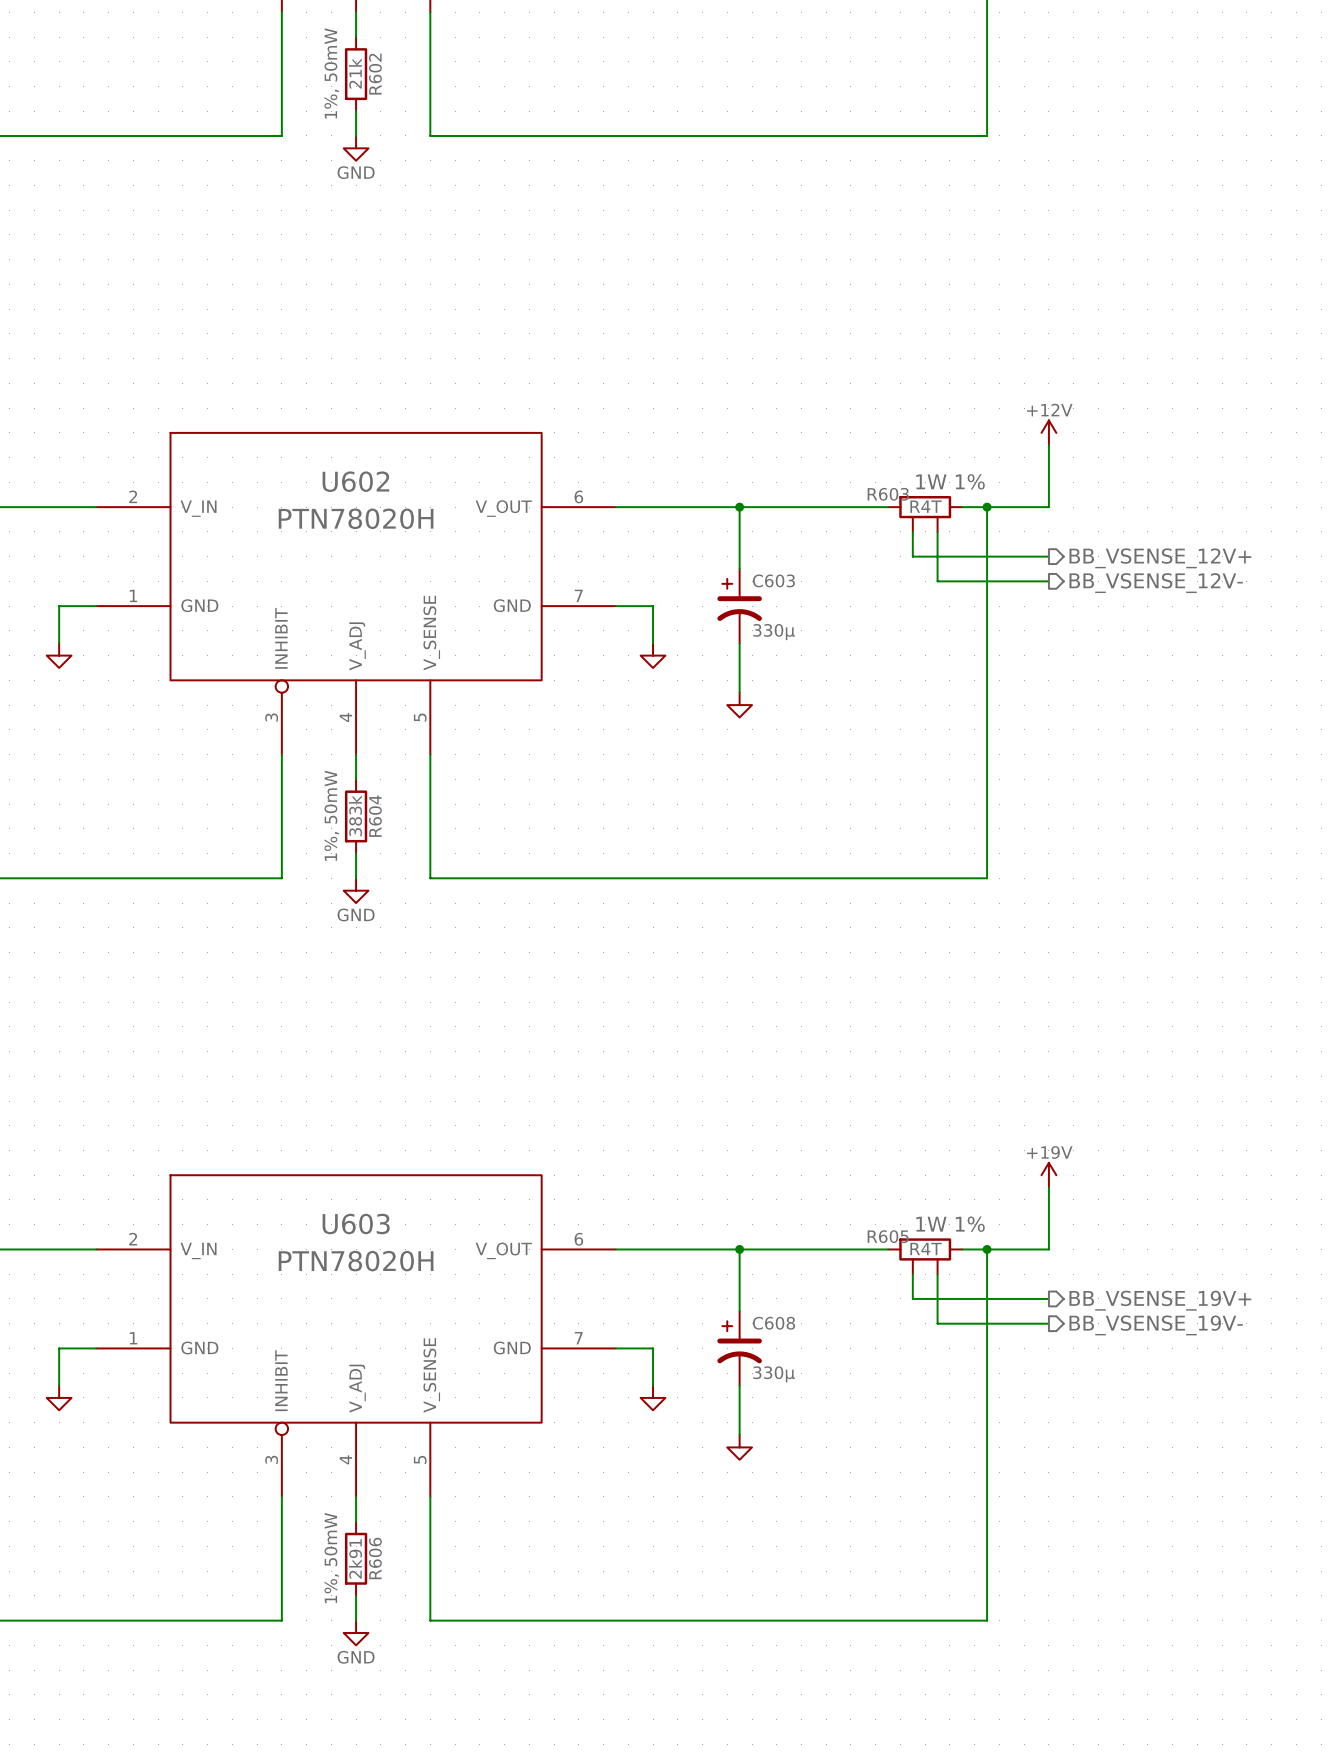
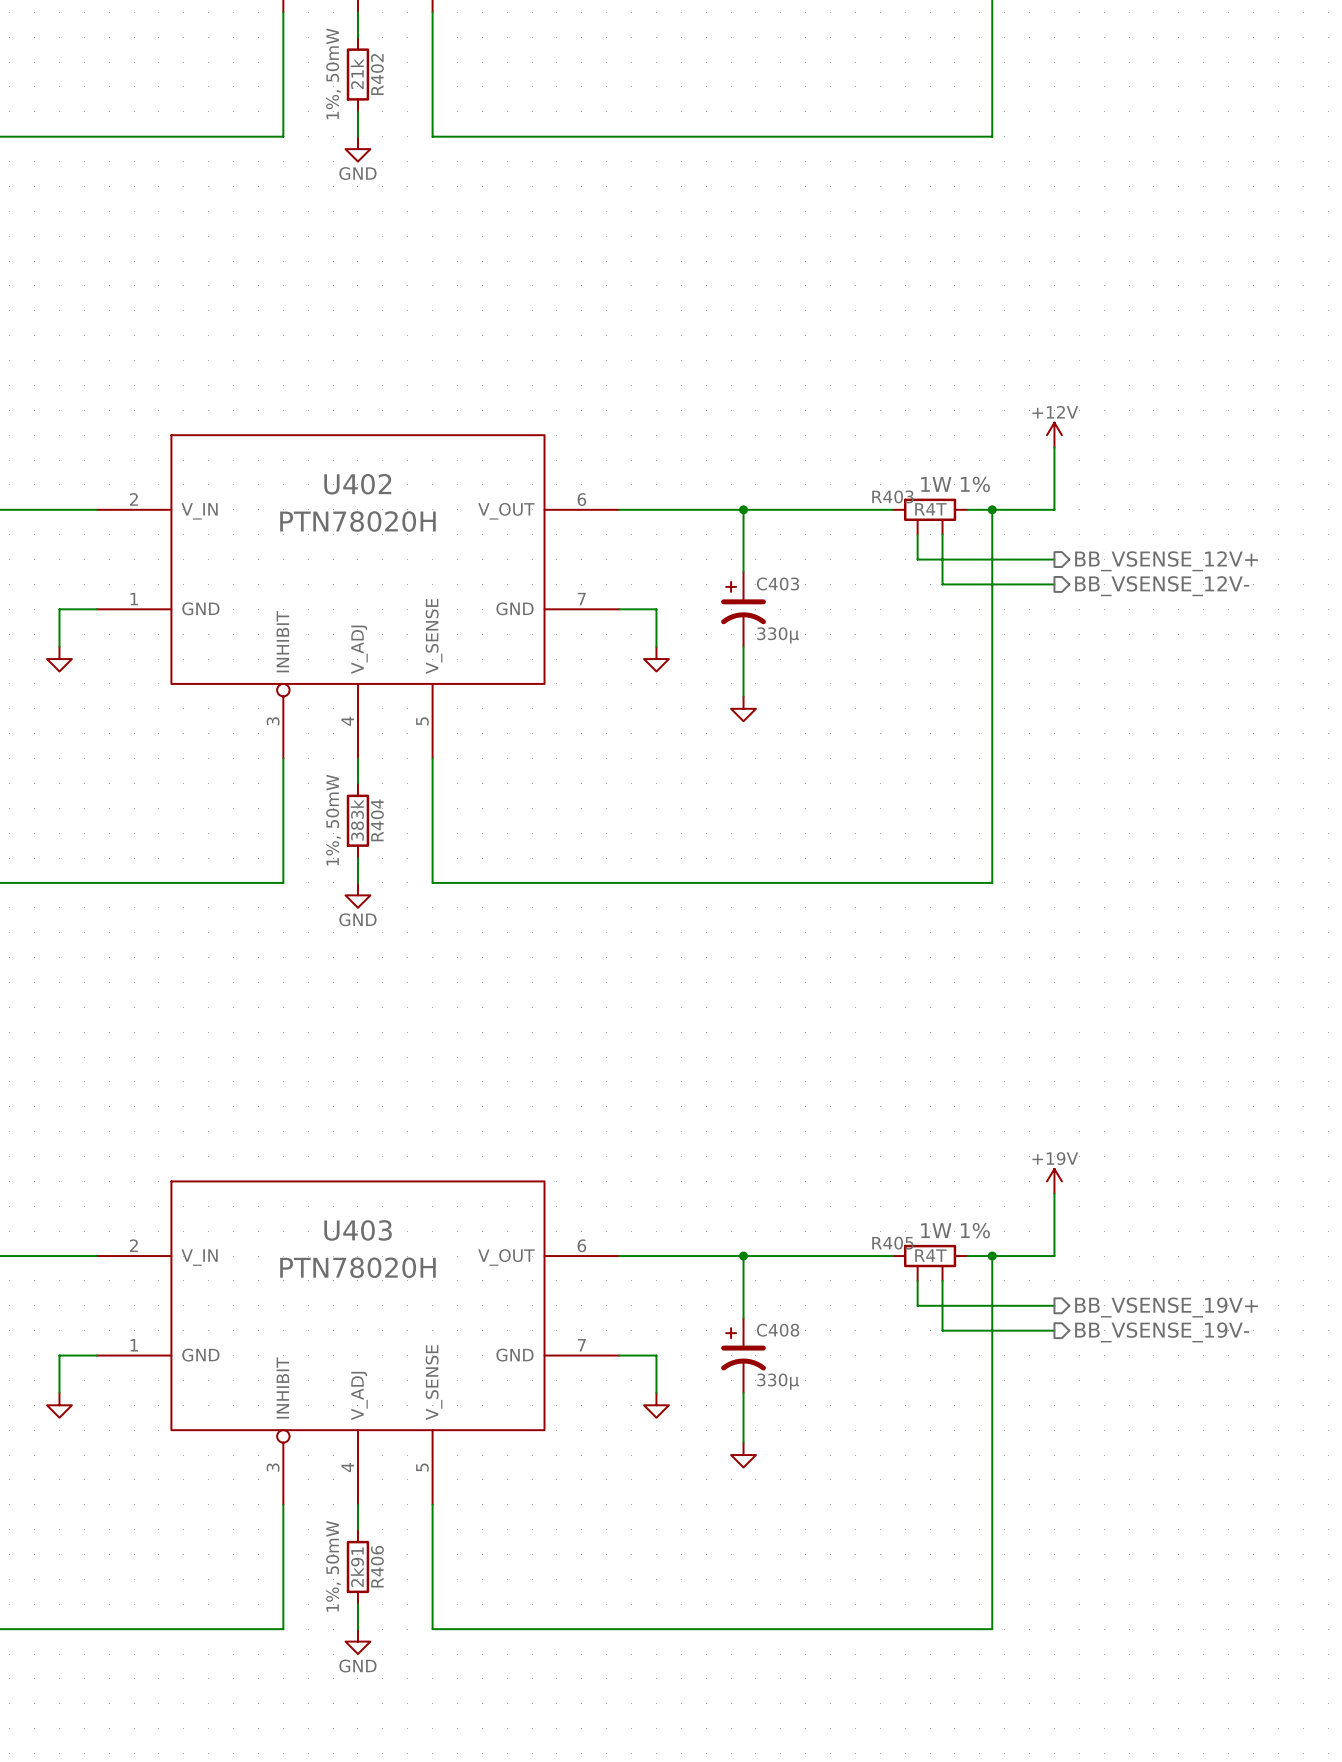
R602 name: R602 (375, 74) -> R402 (377, 74)
U602 name: U602 (355, 481) -> U402 (357, 484)
R603 name: R603 (888, 494) -> R403 (892, 496)
C603 name: C603 (773, 580) -> C403 (777, 583)
R604 name: R604 (375, 816) -> R404 (377, 820)
U603 name: U603 (356, 1223) -> U403 (358, 1230)
R605 name: R605 (888, 1236) -> R405 (892, 1243)
C608 name: C608 (774, 1323) -> C408 (778, 1330)
R606 name: R606 (375, 1558) -> R406 (377, 1566)

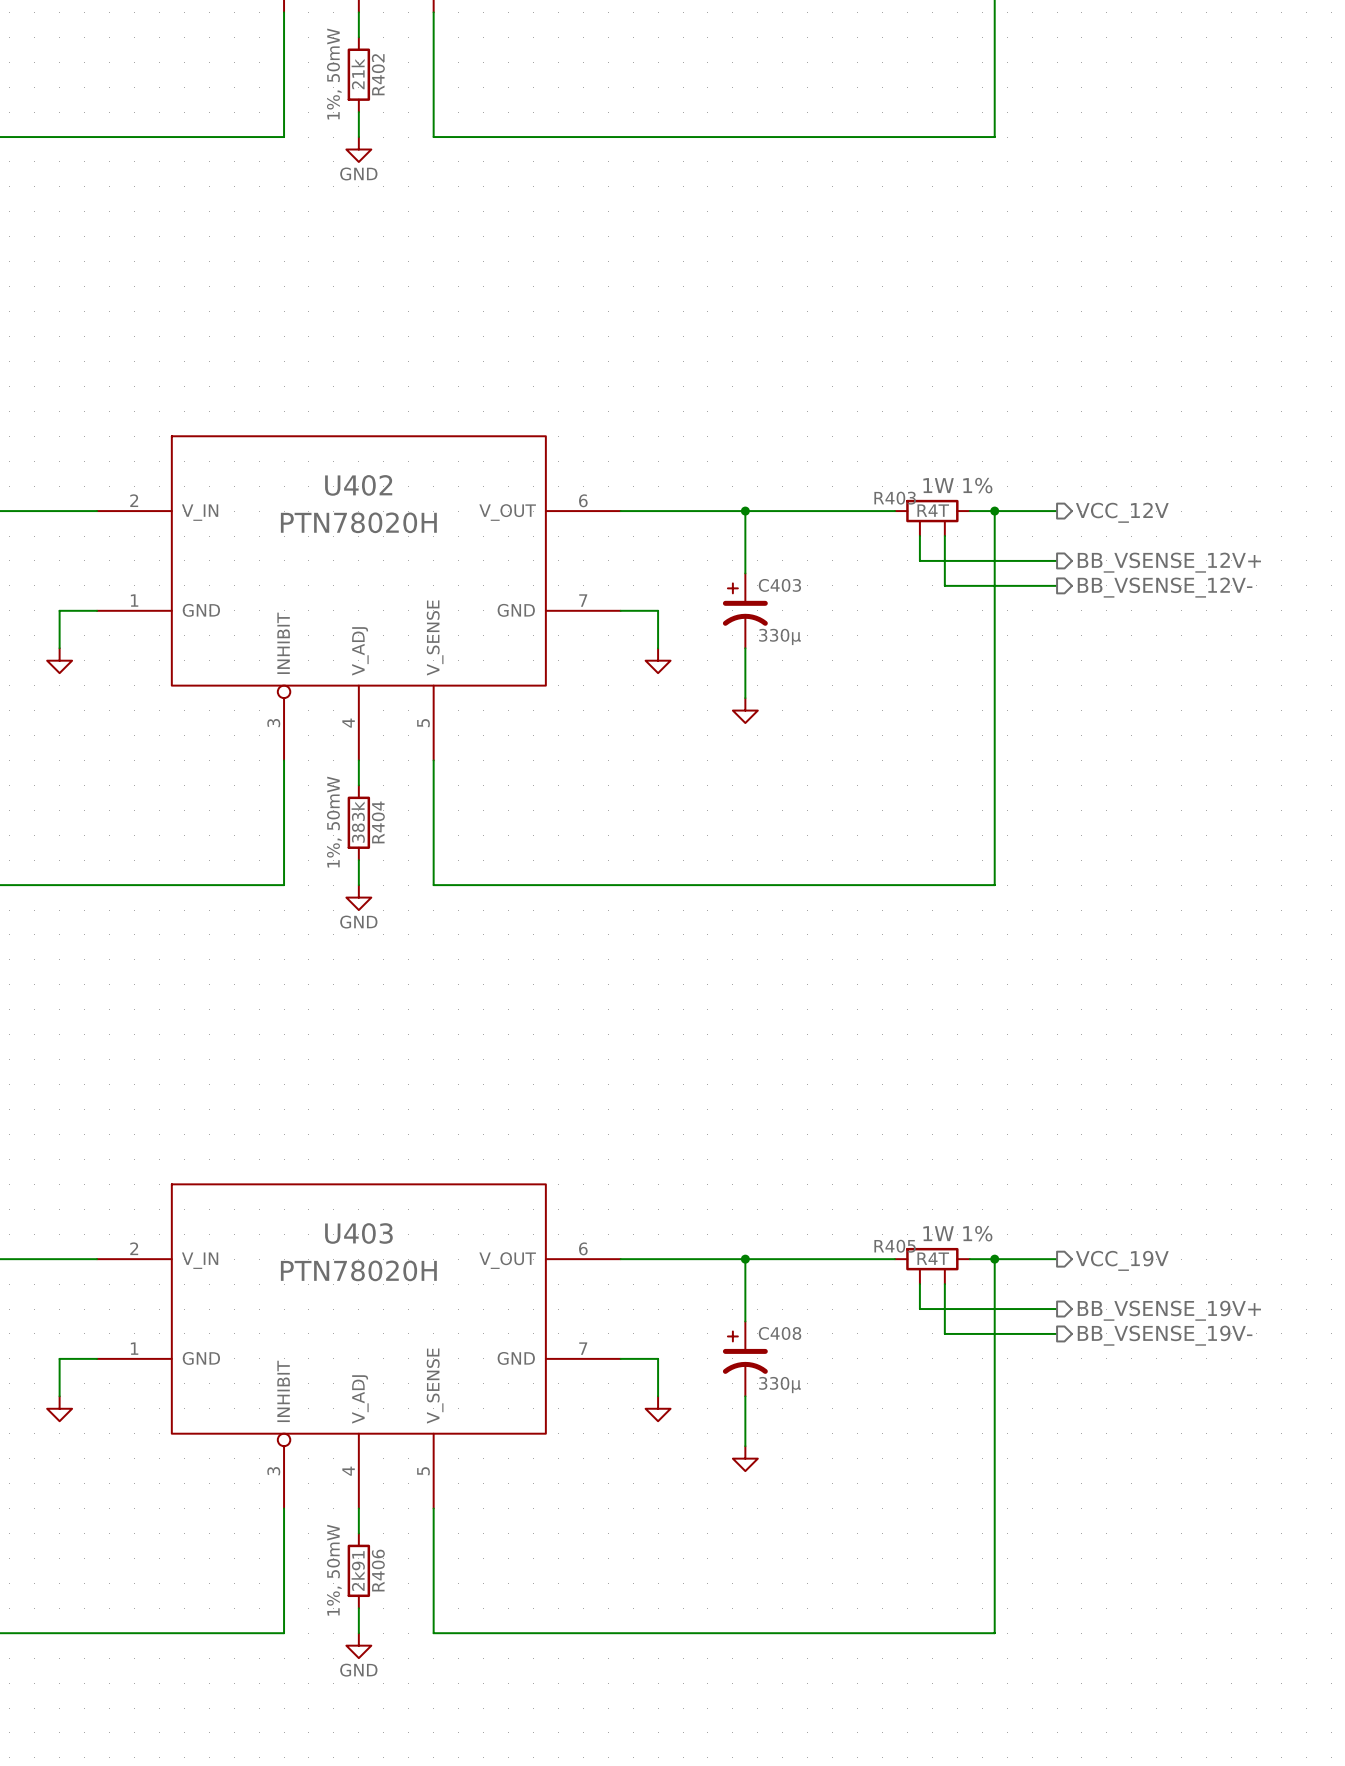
power symbol: +12V (1054, 435) -> none
wire: (1054, 447) (1054, 509) -> none
hierarchical label: none -> VCC_12V (1122, 512)
power symbol: +19V (1054, 1181) -> none
wire: (1054, 1193) (1054, 1256) -> none
hierarchical label: none -> VCC_19V (1122, 1260)

